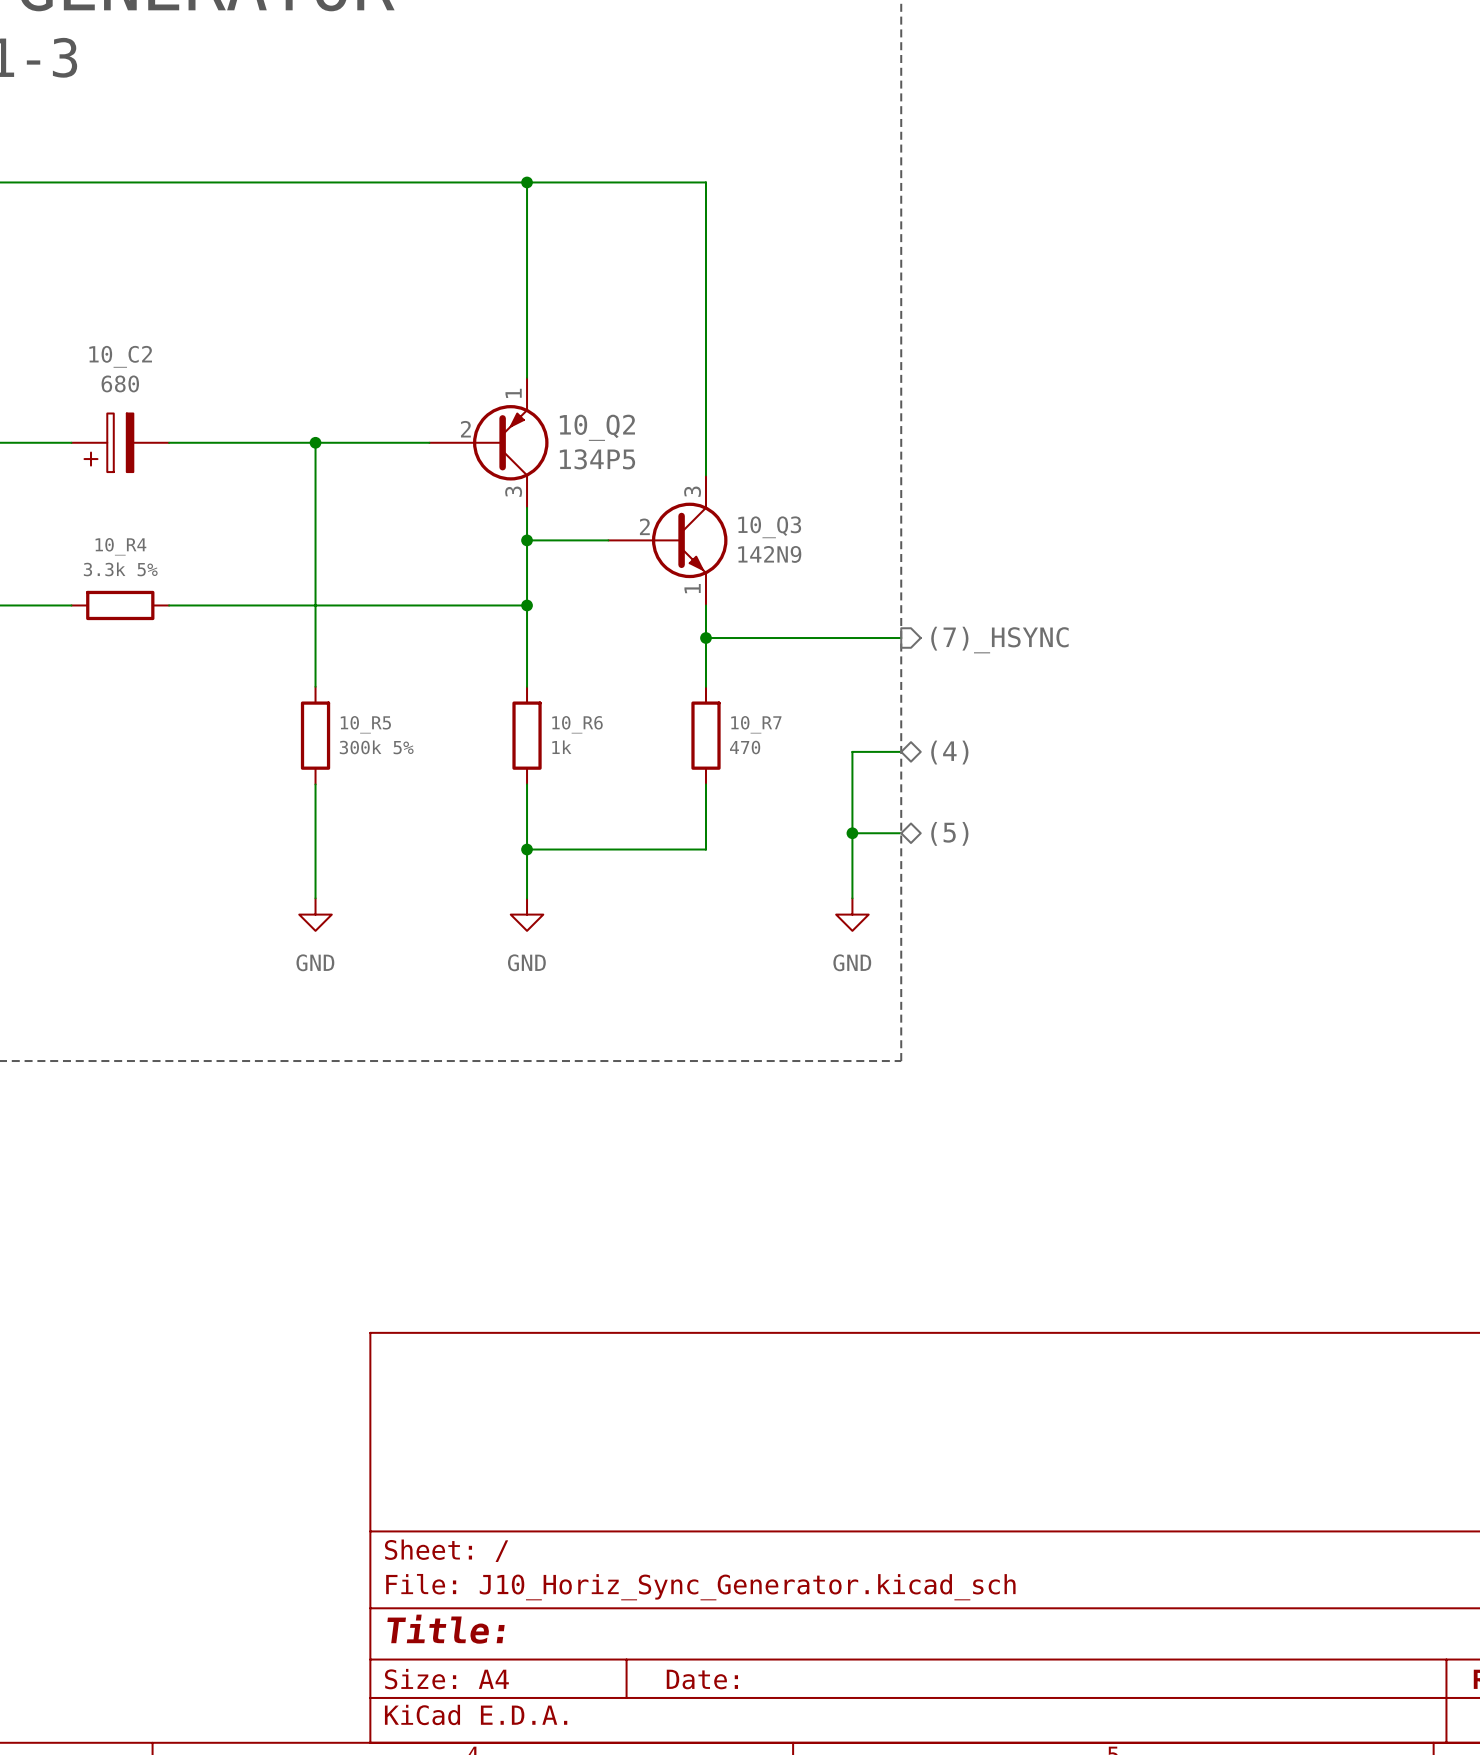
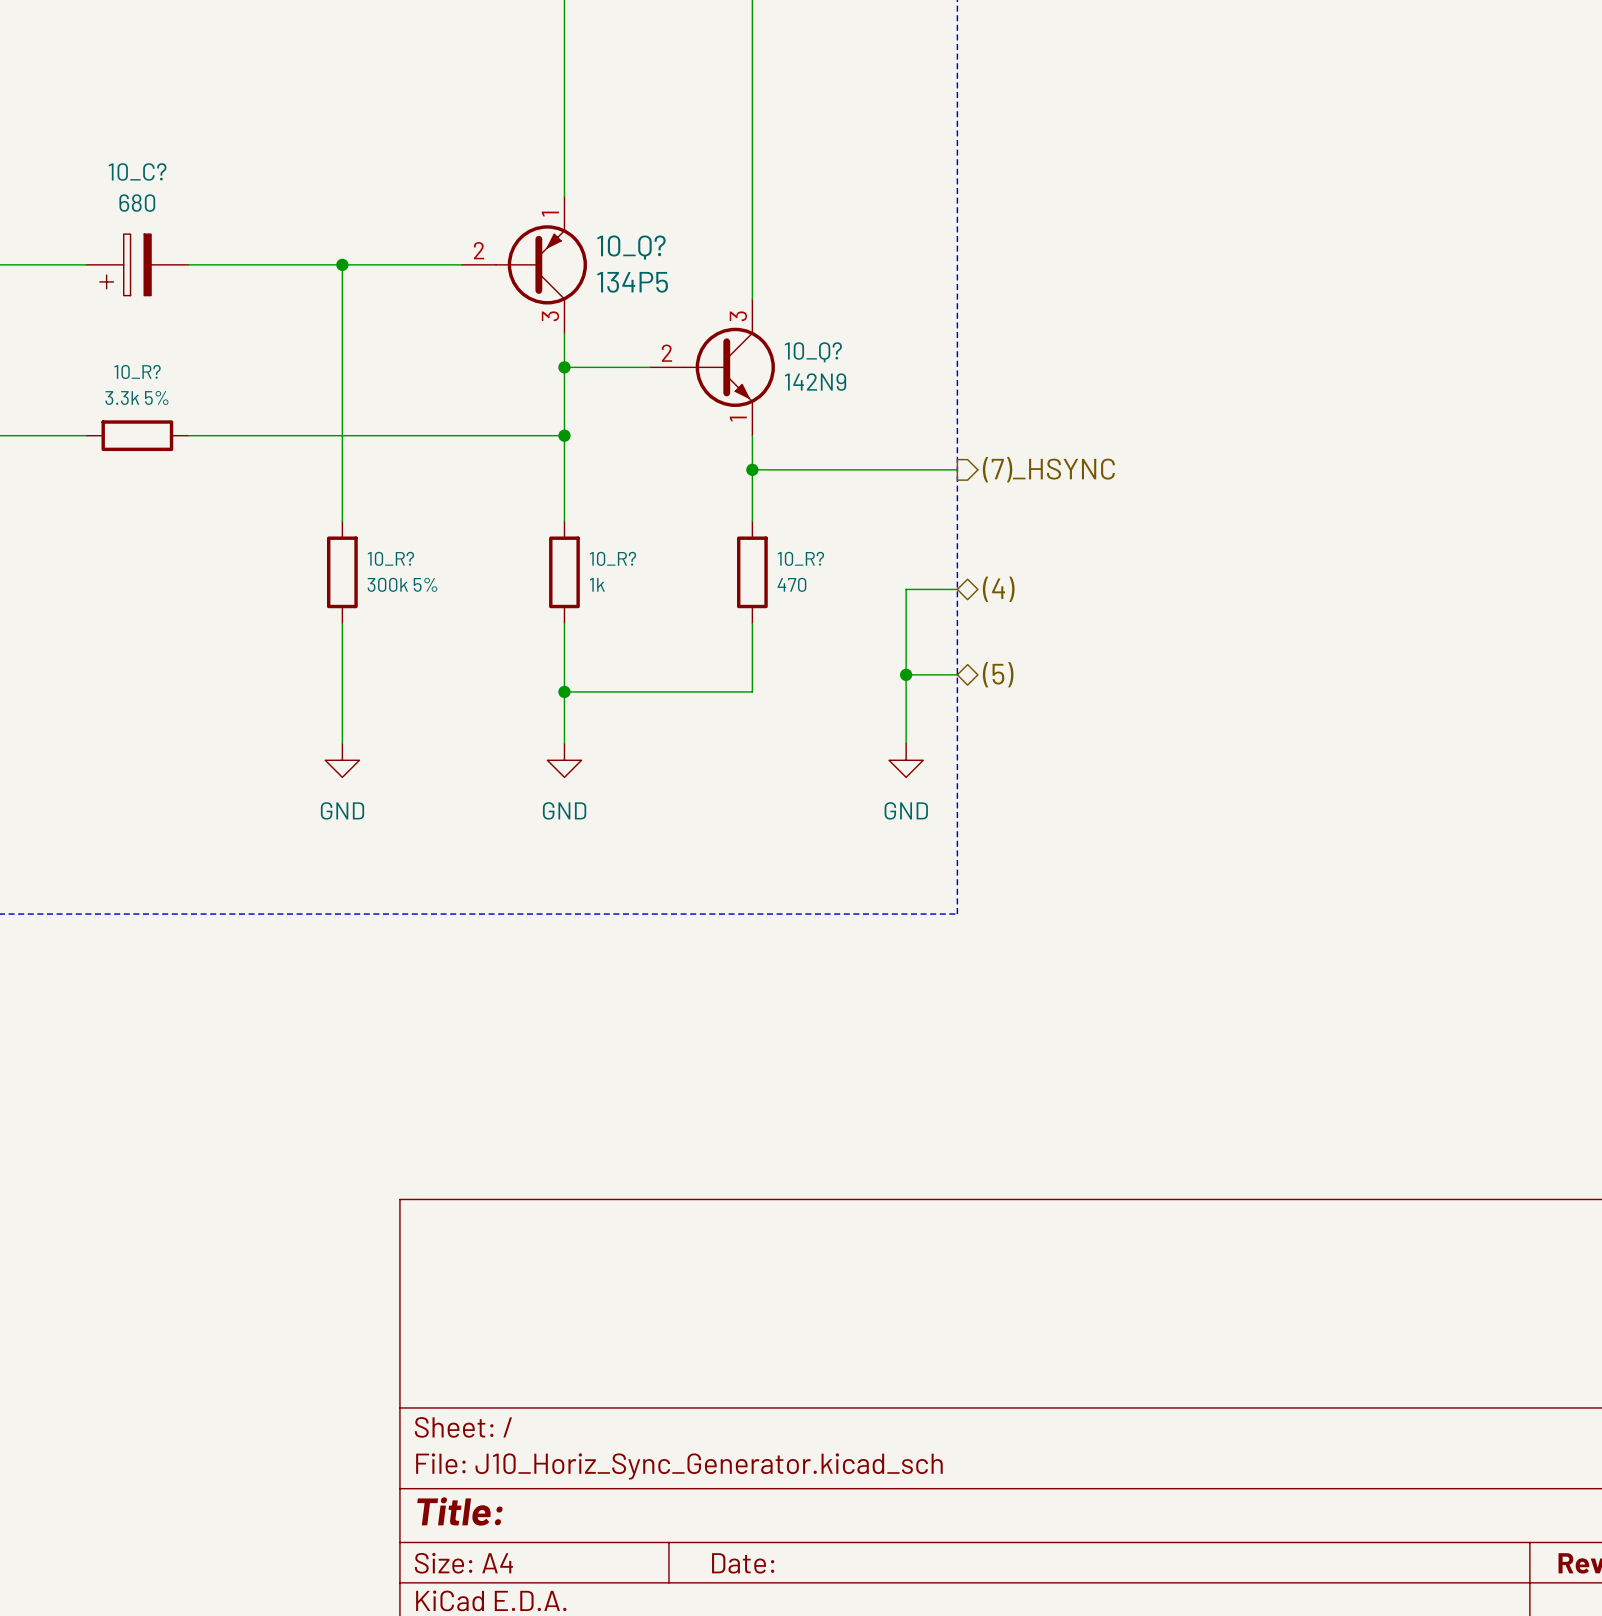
10_C2 name: 10_C2 (120, 356) -> 10_C? (137, 171)
10_Q2: 134P5 (488, 442) -> none
10_Q?: none -> 134P5 (524, 264)
10_Q3: 142N9 (667, 540) -> none
10_Q?: none -> 142N9 (712, 367)
10_R4 name: 10_R4 (120, 546) -> 10_R? (137, 371)
10_R5 name: 10_R5 (365, 724) -> 10_R? (390, 558)
10_R6 name: 10_R6 (577, 724) -> 10_R? (613, 558)
10_R7 name: 10_R7 (756, 724) -> 10_R? (800, 558)

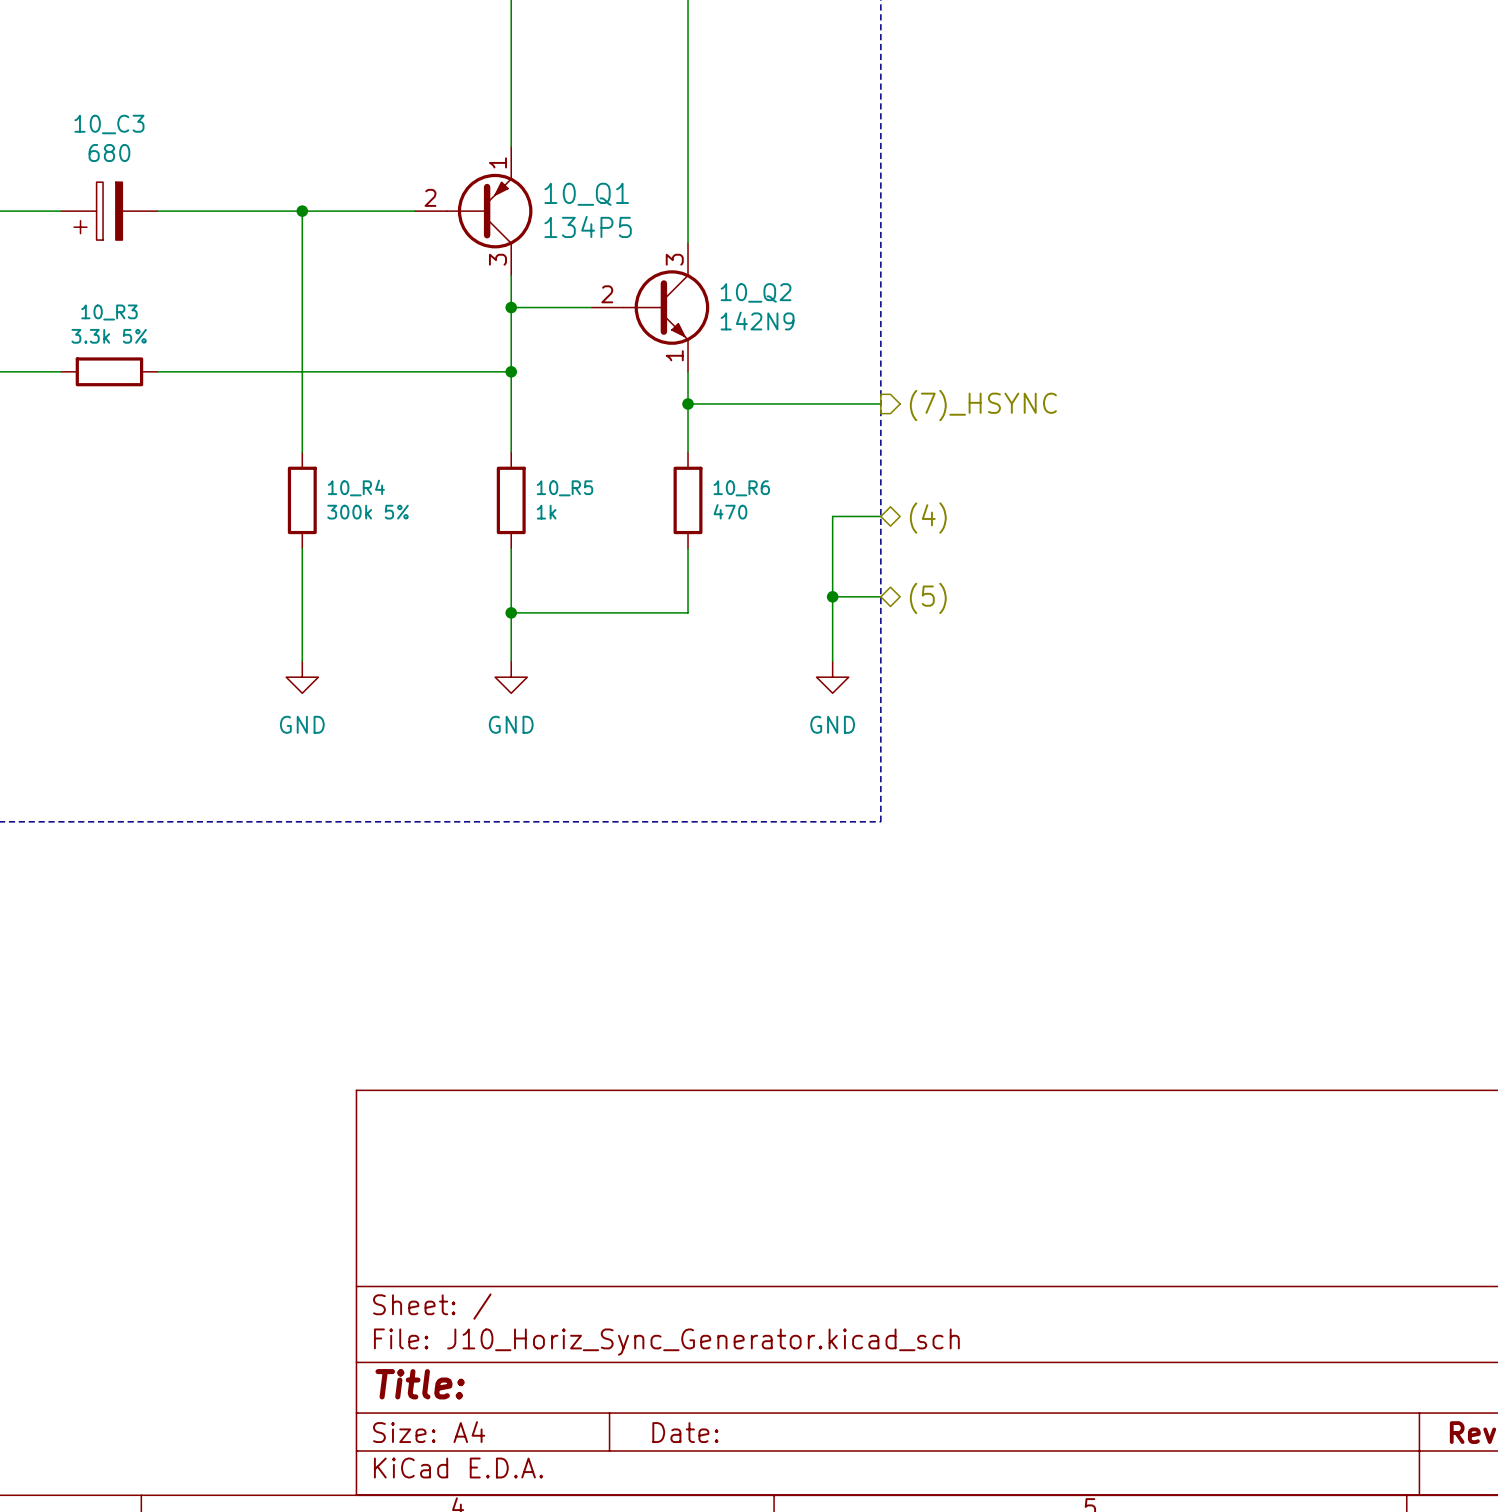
10_C? name: 10_C? (137, 171) -> 10_C3 (109, 124)
10_Q? name: 10_Q? (631, 247) -> 10_Q1 (586, 194)
10_Q? name: 10_Q? (813, 352) -> 10_Q2 (756, 292)
10_R? name: 10_R? (137, 371) -> 10_R3 (109, 312)
10_R? name: 10_R? (390, 558) -> 10_R4 (356, 488)
10_R? name: 10_R? (613, 558) -> 10_R5 (565, 488)
10_R? name: 10_R? (800, 558) -> 10_R6 (741, 488)

